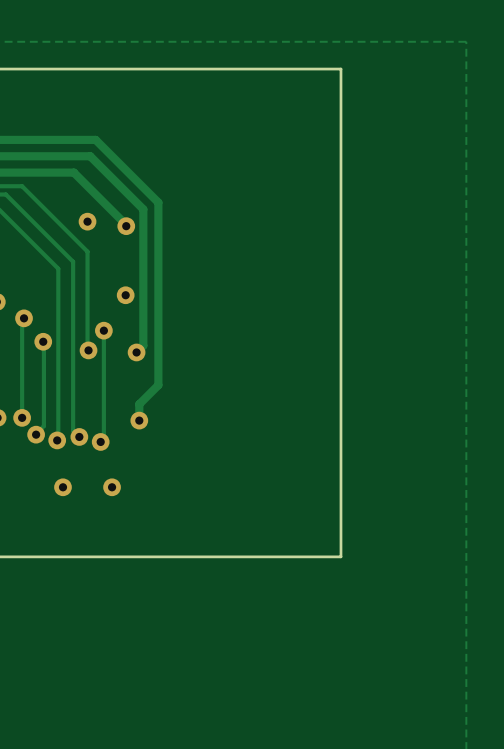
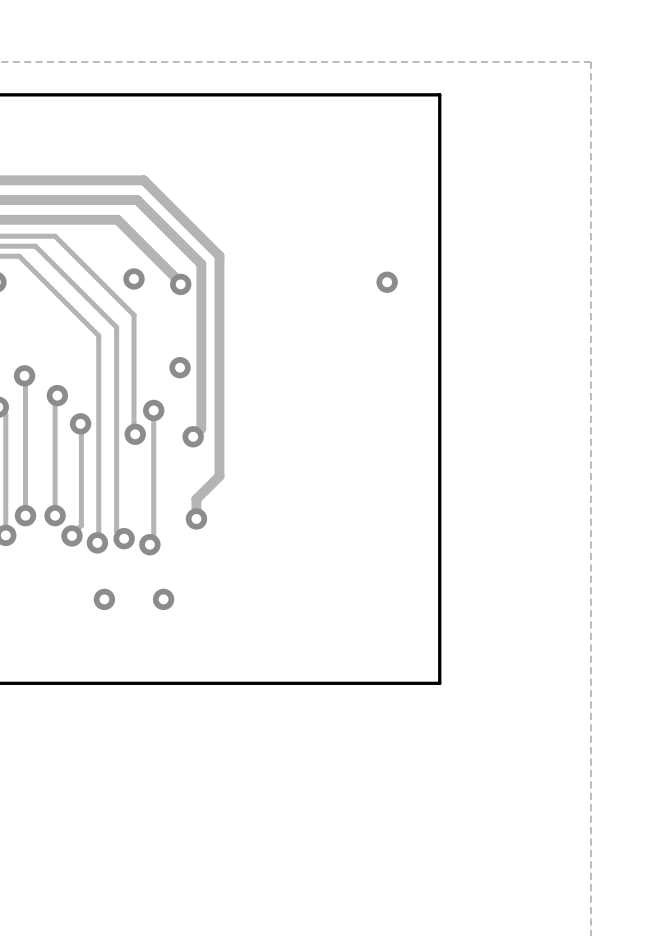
via: none -> (387, 282)

